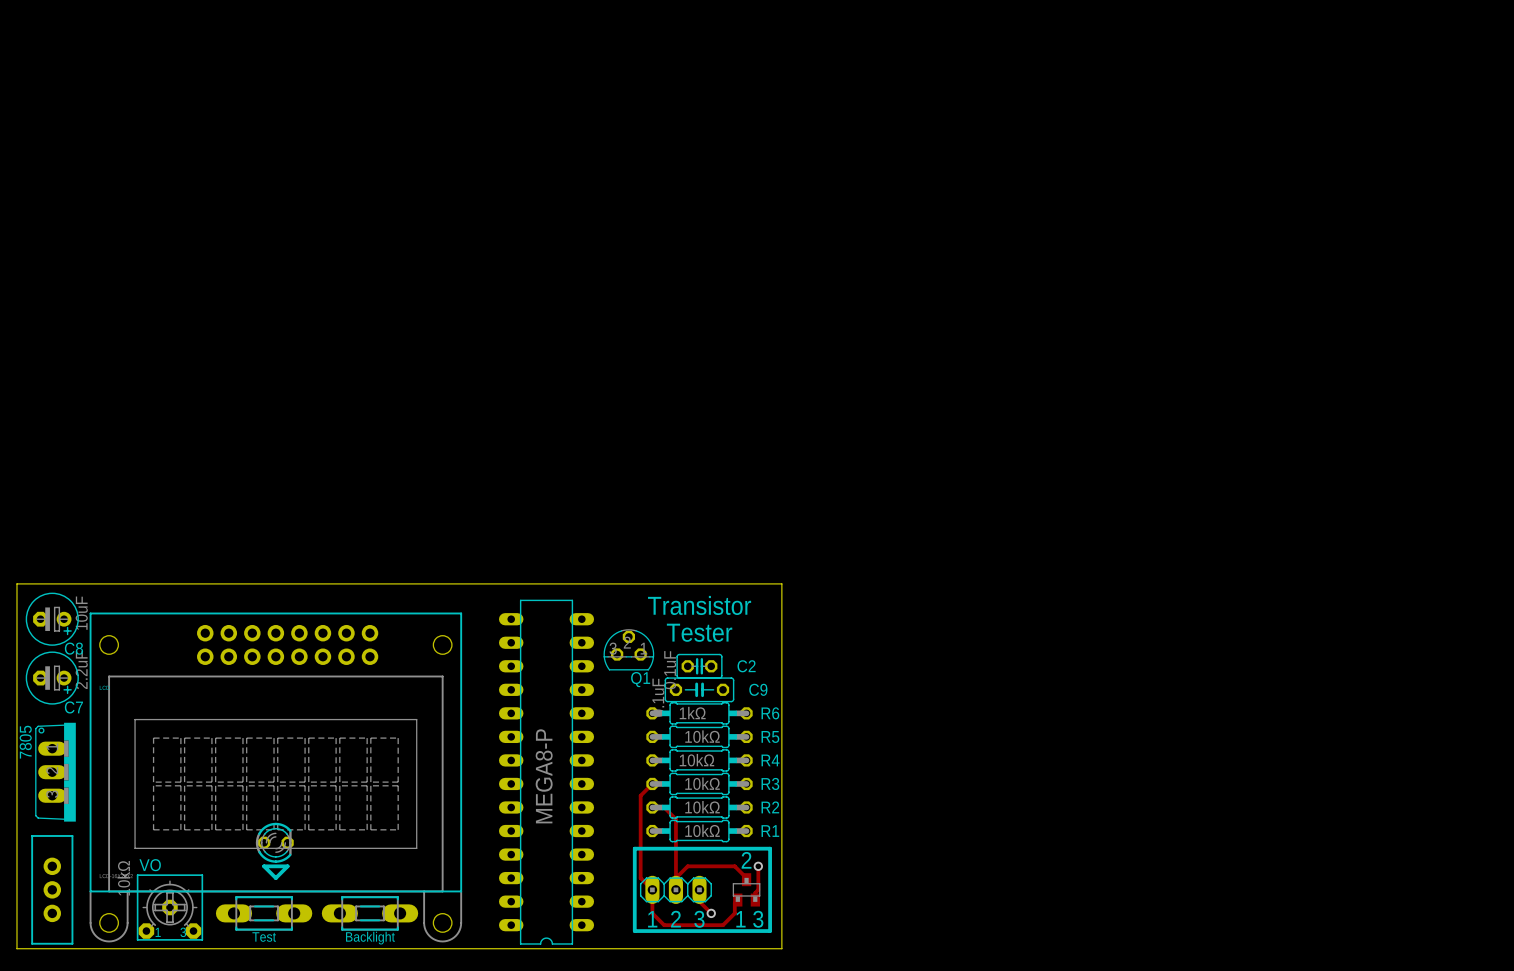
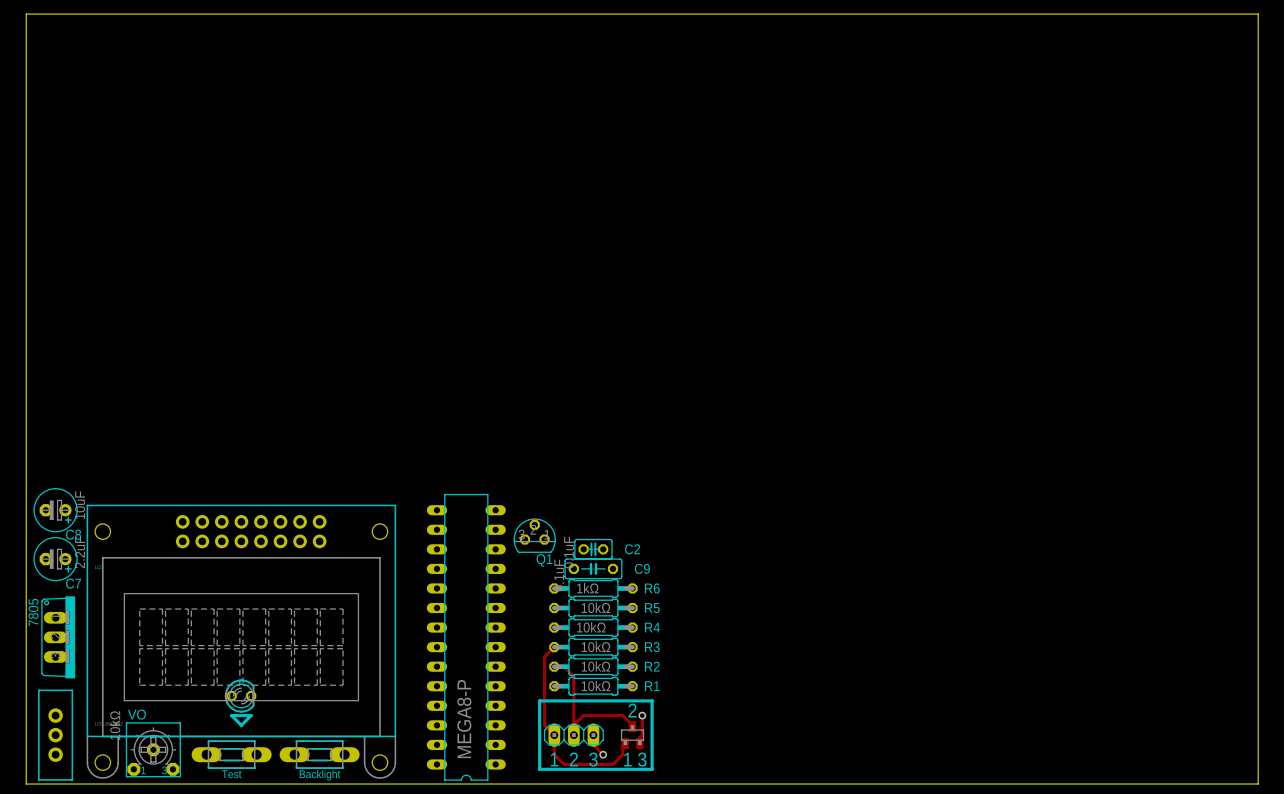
board edge: (16, 583) (781, 583) (781, 948) -> (26, 480) (26, 14) (1258, 14) (1258, 784) (661, 784)
text: Transistor (699, 605) -> none
text: Tester (699, 632) -> none
part value position: MEGA8-P (544, 776) -> MEGA8-P (464, 719)

